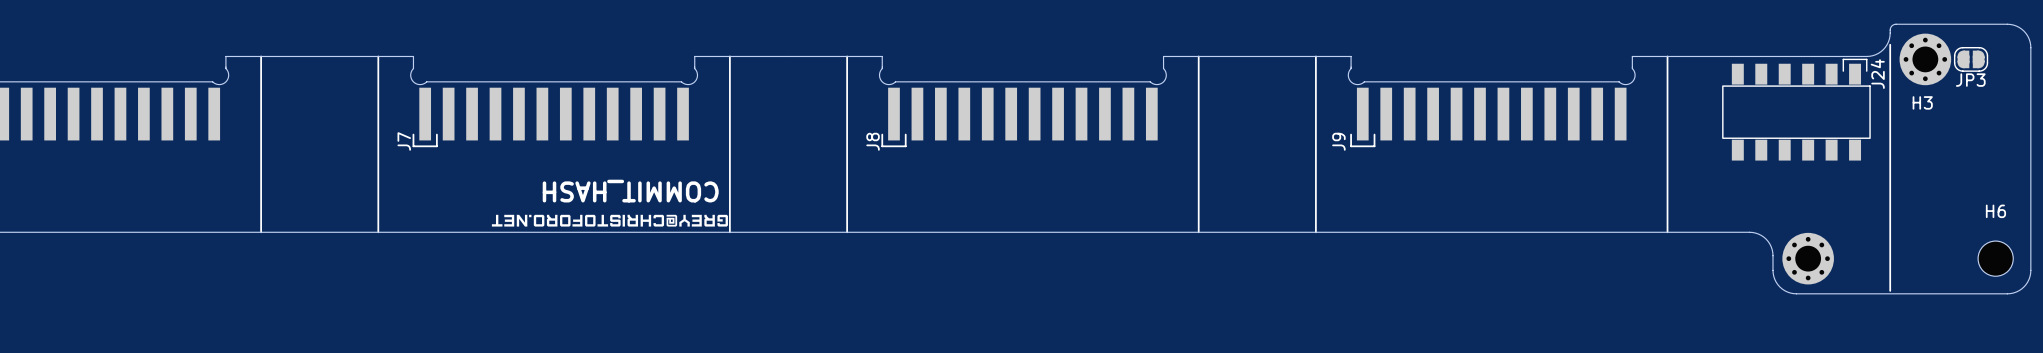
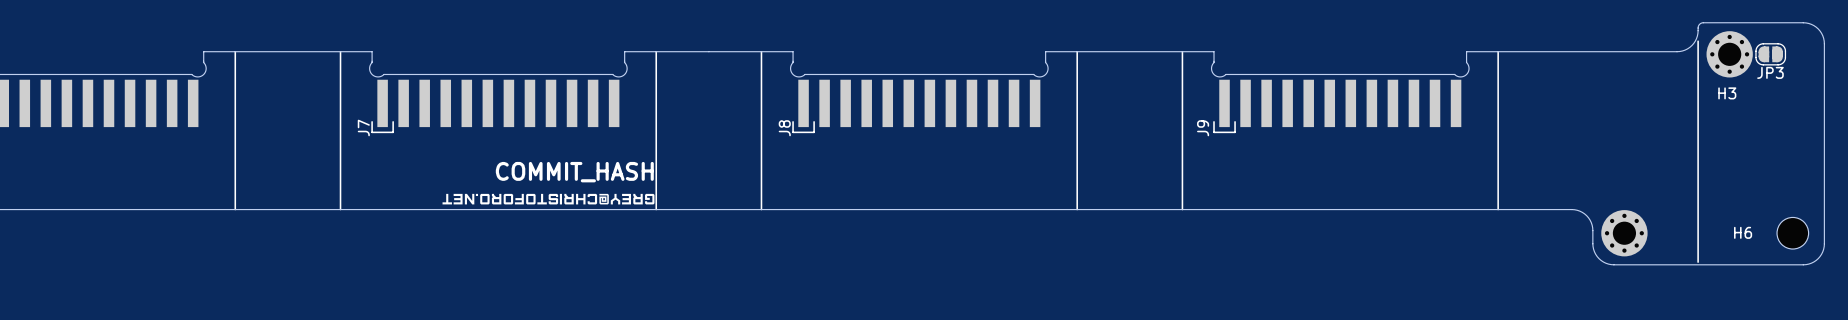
J24: (1796, 109) -> none
text rotation: 0° (630, 191) -> 180° (574, 172)
H6 name position: H6 (1995, 211) -> H6 (1743, 232)

